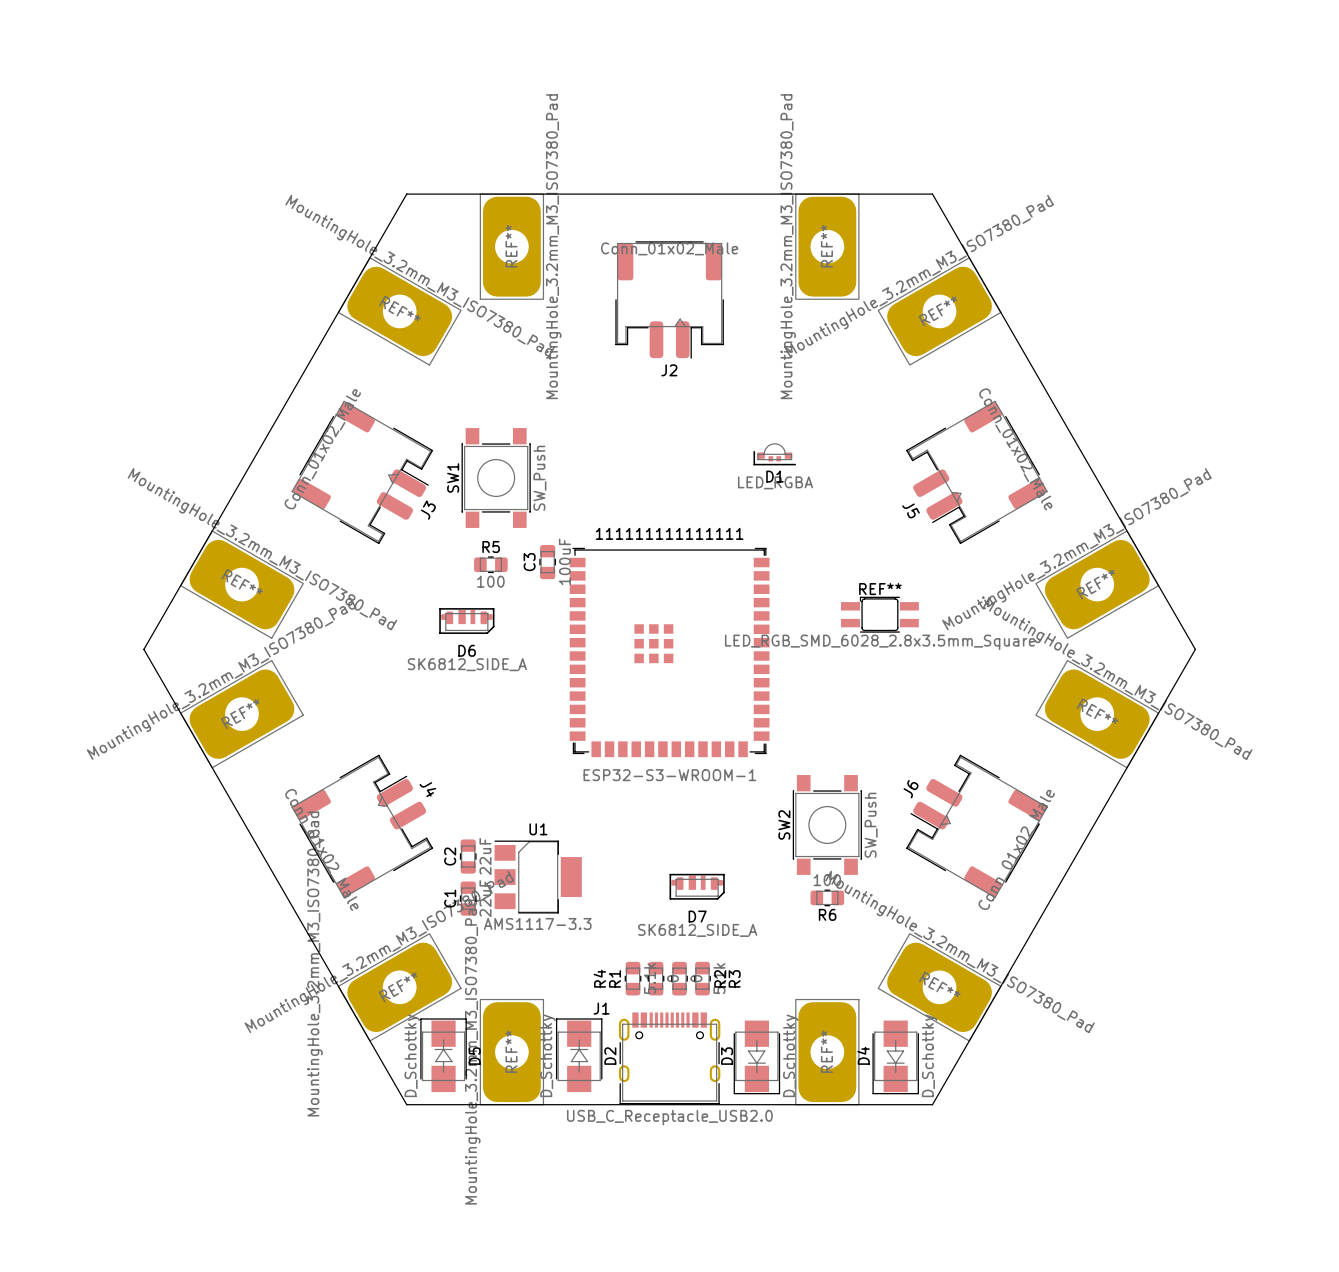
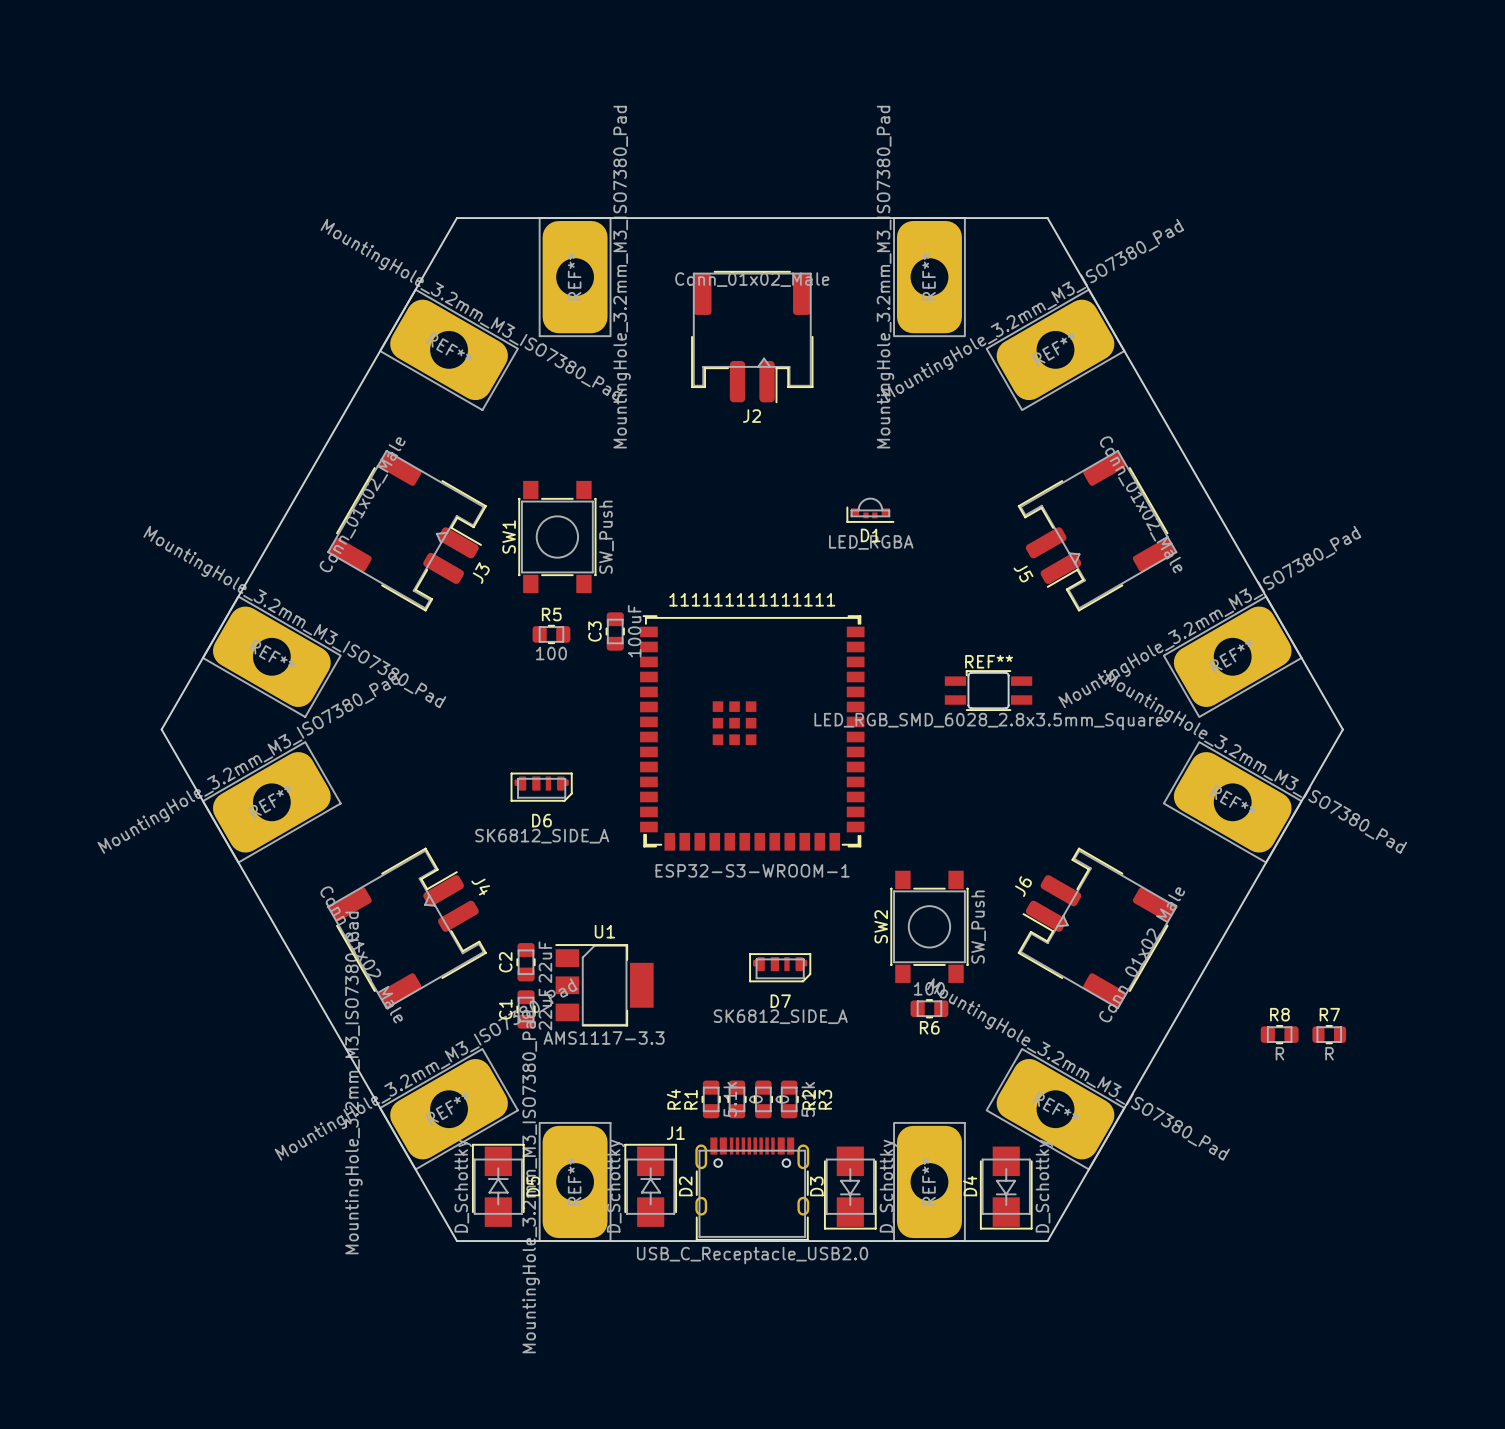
D6 footprint: [439, 608, 495, 634] -> [510, 772, 573, 802]
D7 footprint: [669, 873, 725, 900] -> [749, 953, 812, 983]
R8: none -> R (1279, 1034)
R7: none -> R (1329, 1034)

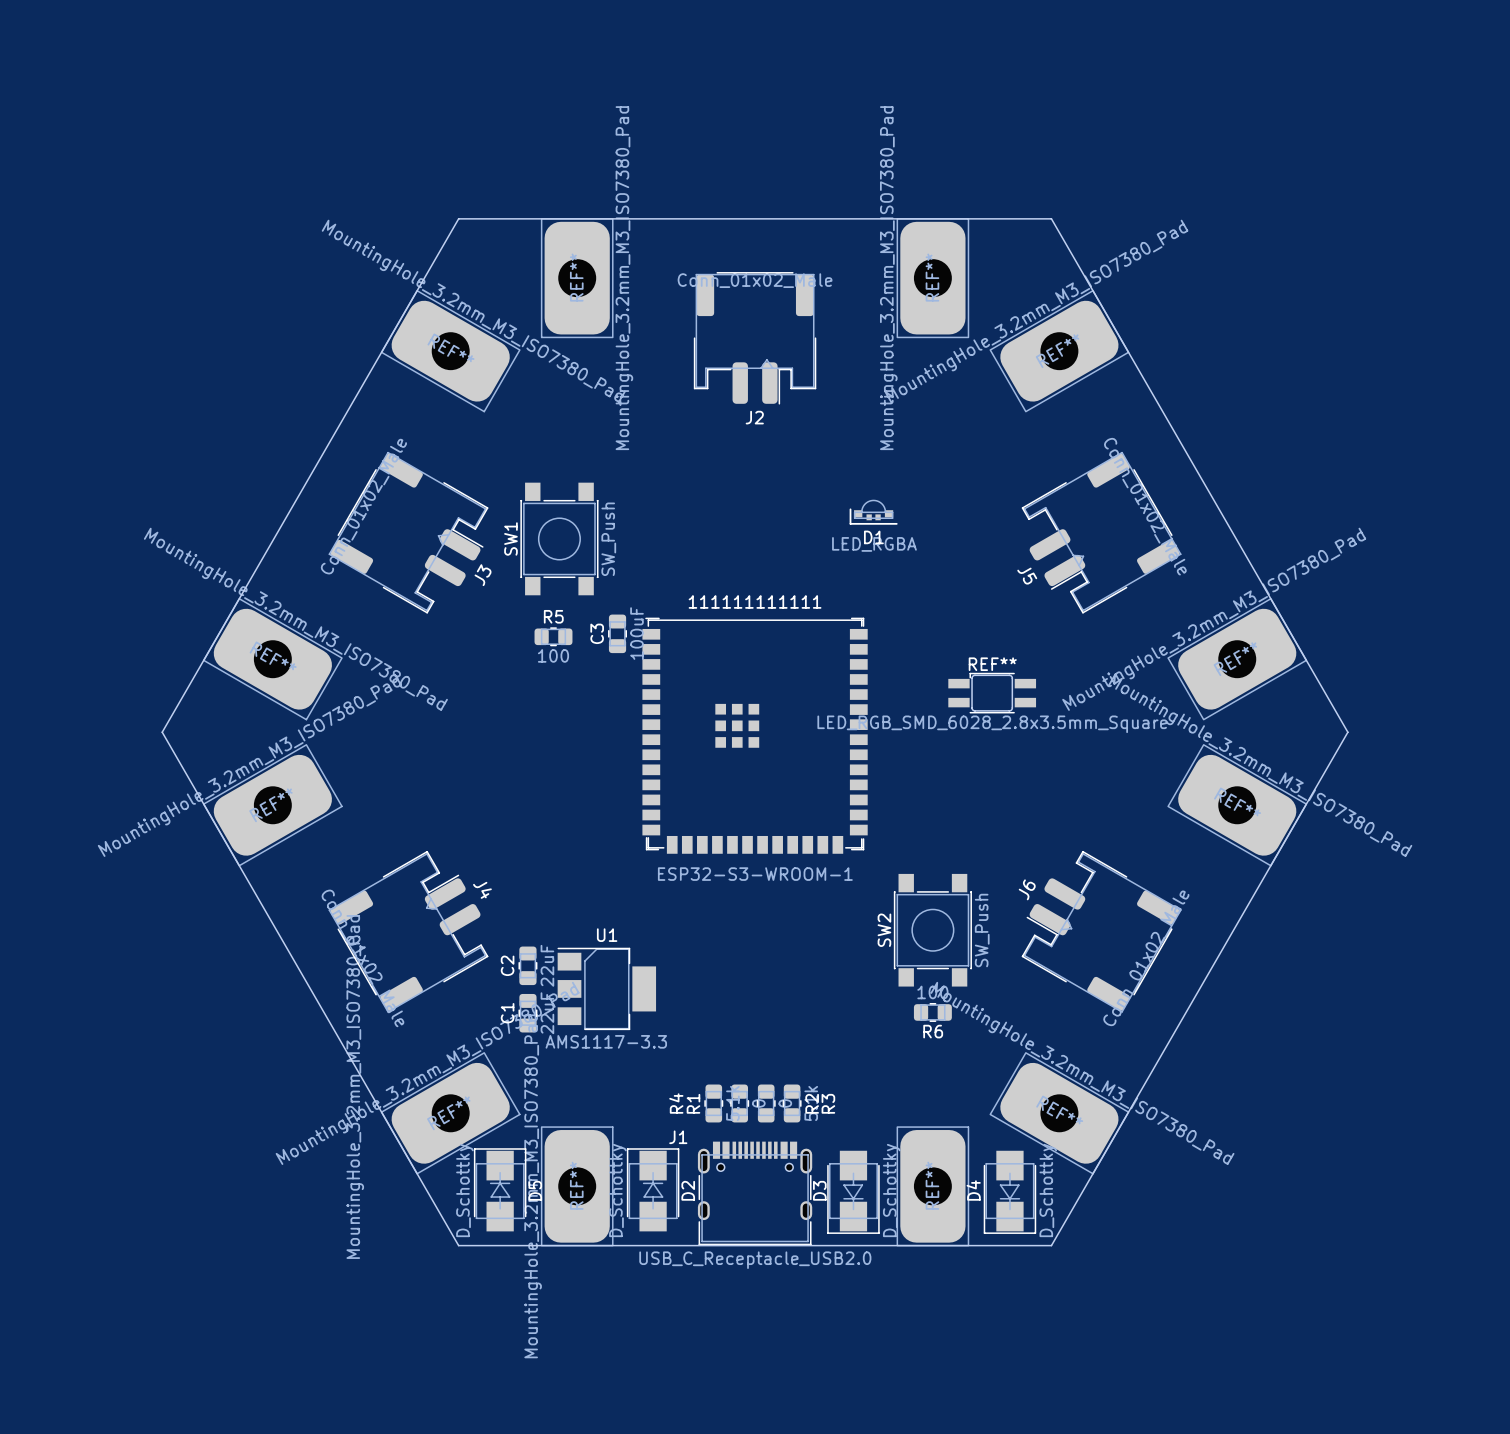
111111111111111 name: 111111111111111 (752, 599) -> 111111111111 (755, 601)
D6: SK6812_SIDE_A (541, 787) -> none
D7: SK6812_SIDE_A (780, 967) -> none
R8: R (1279, 1034) -> none
R7: R (1329, 1034) -> none

